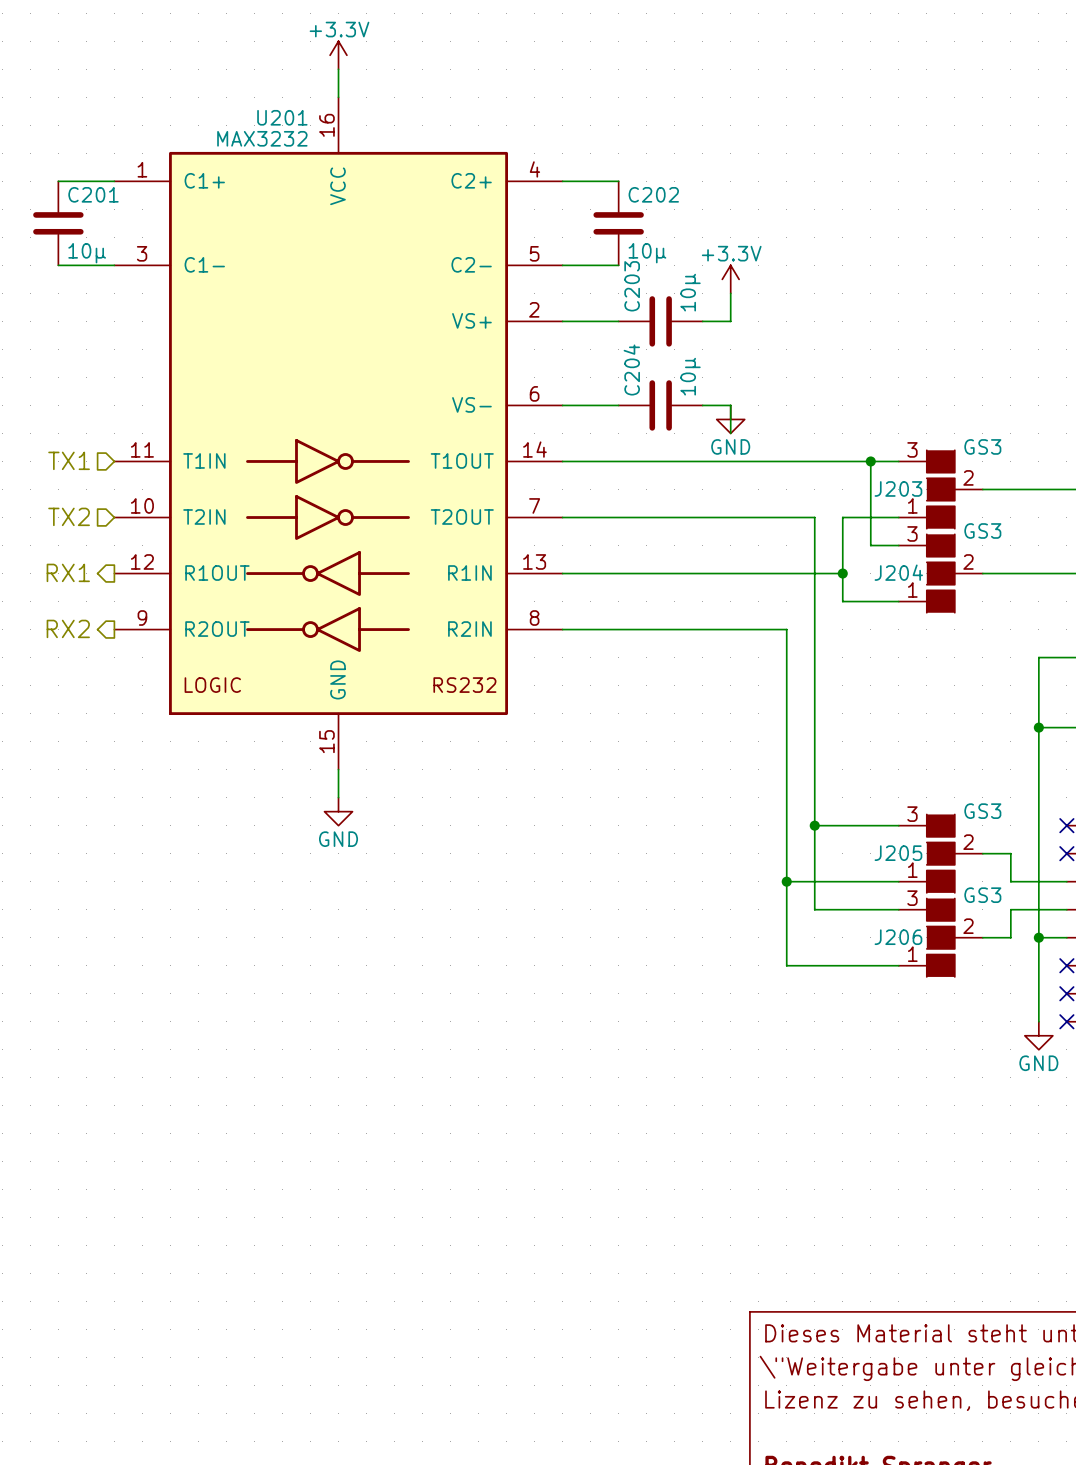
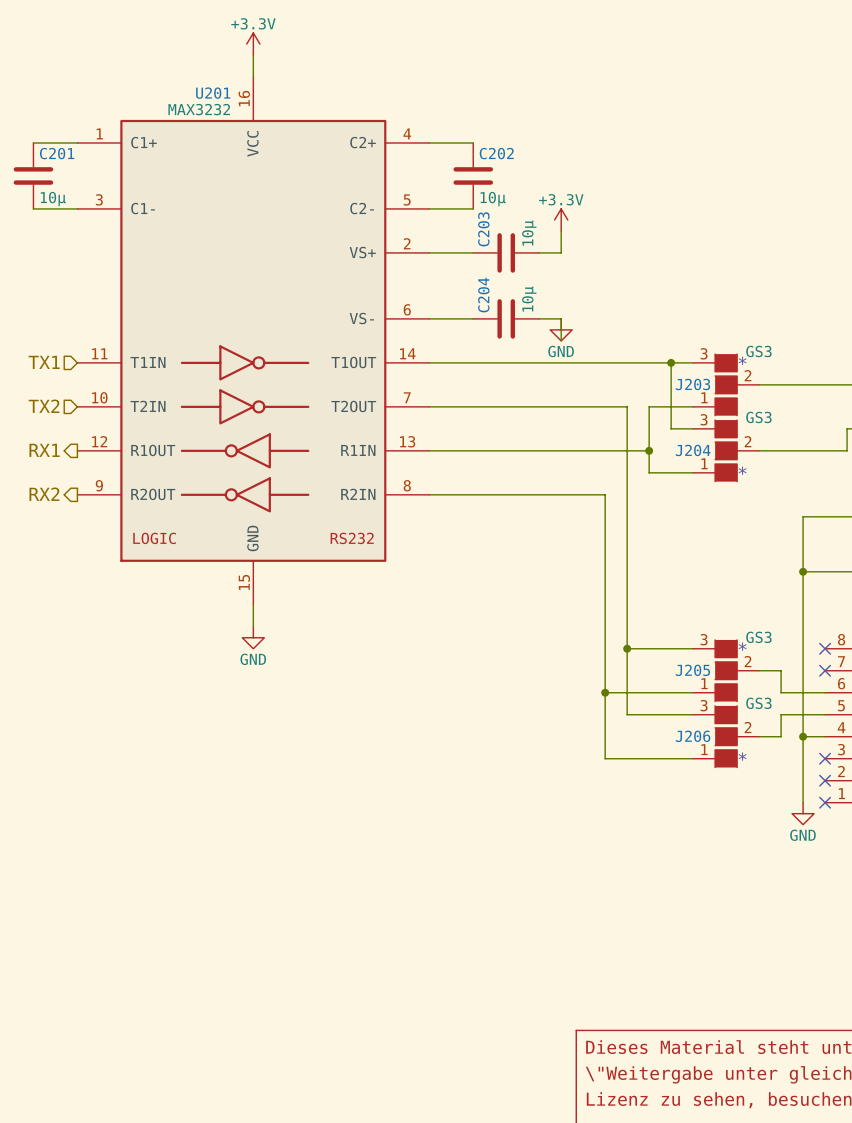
text: none -> * (742, 360)
text: none -> * (742, 470)
text: none -> * (742, 646)
text: none -> * (742, 756)

